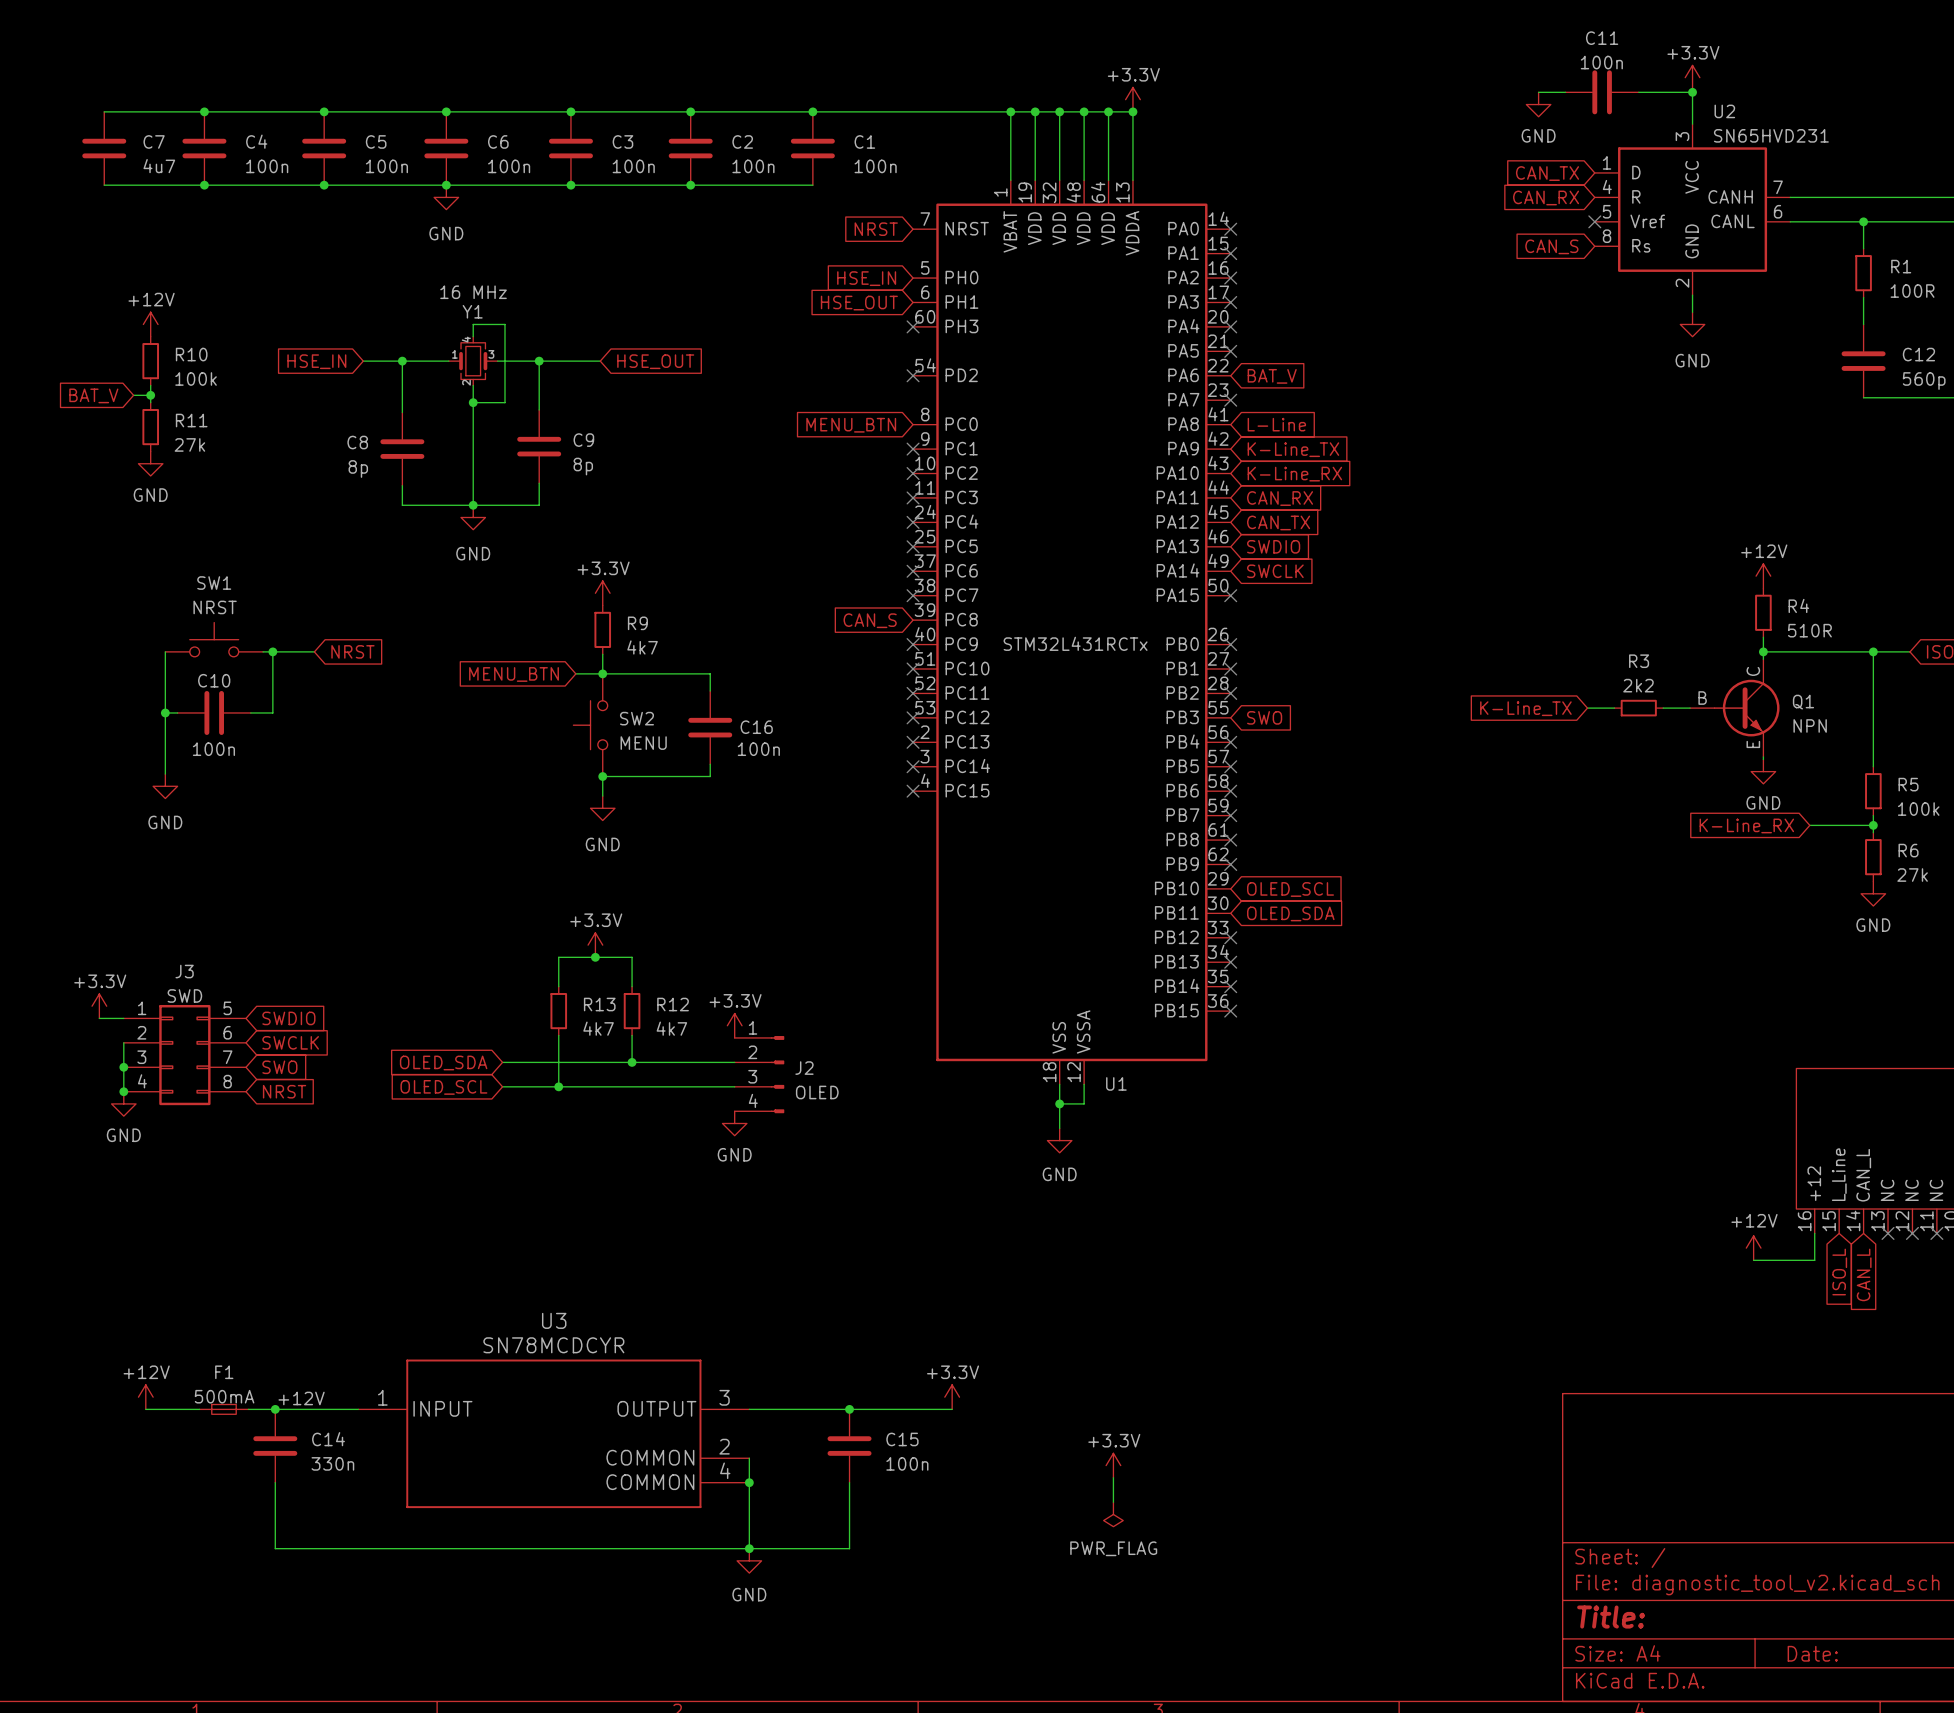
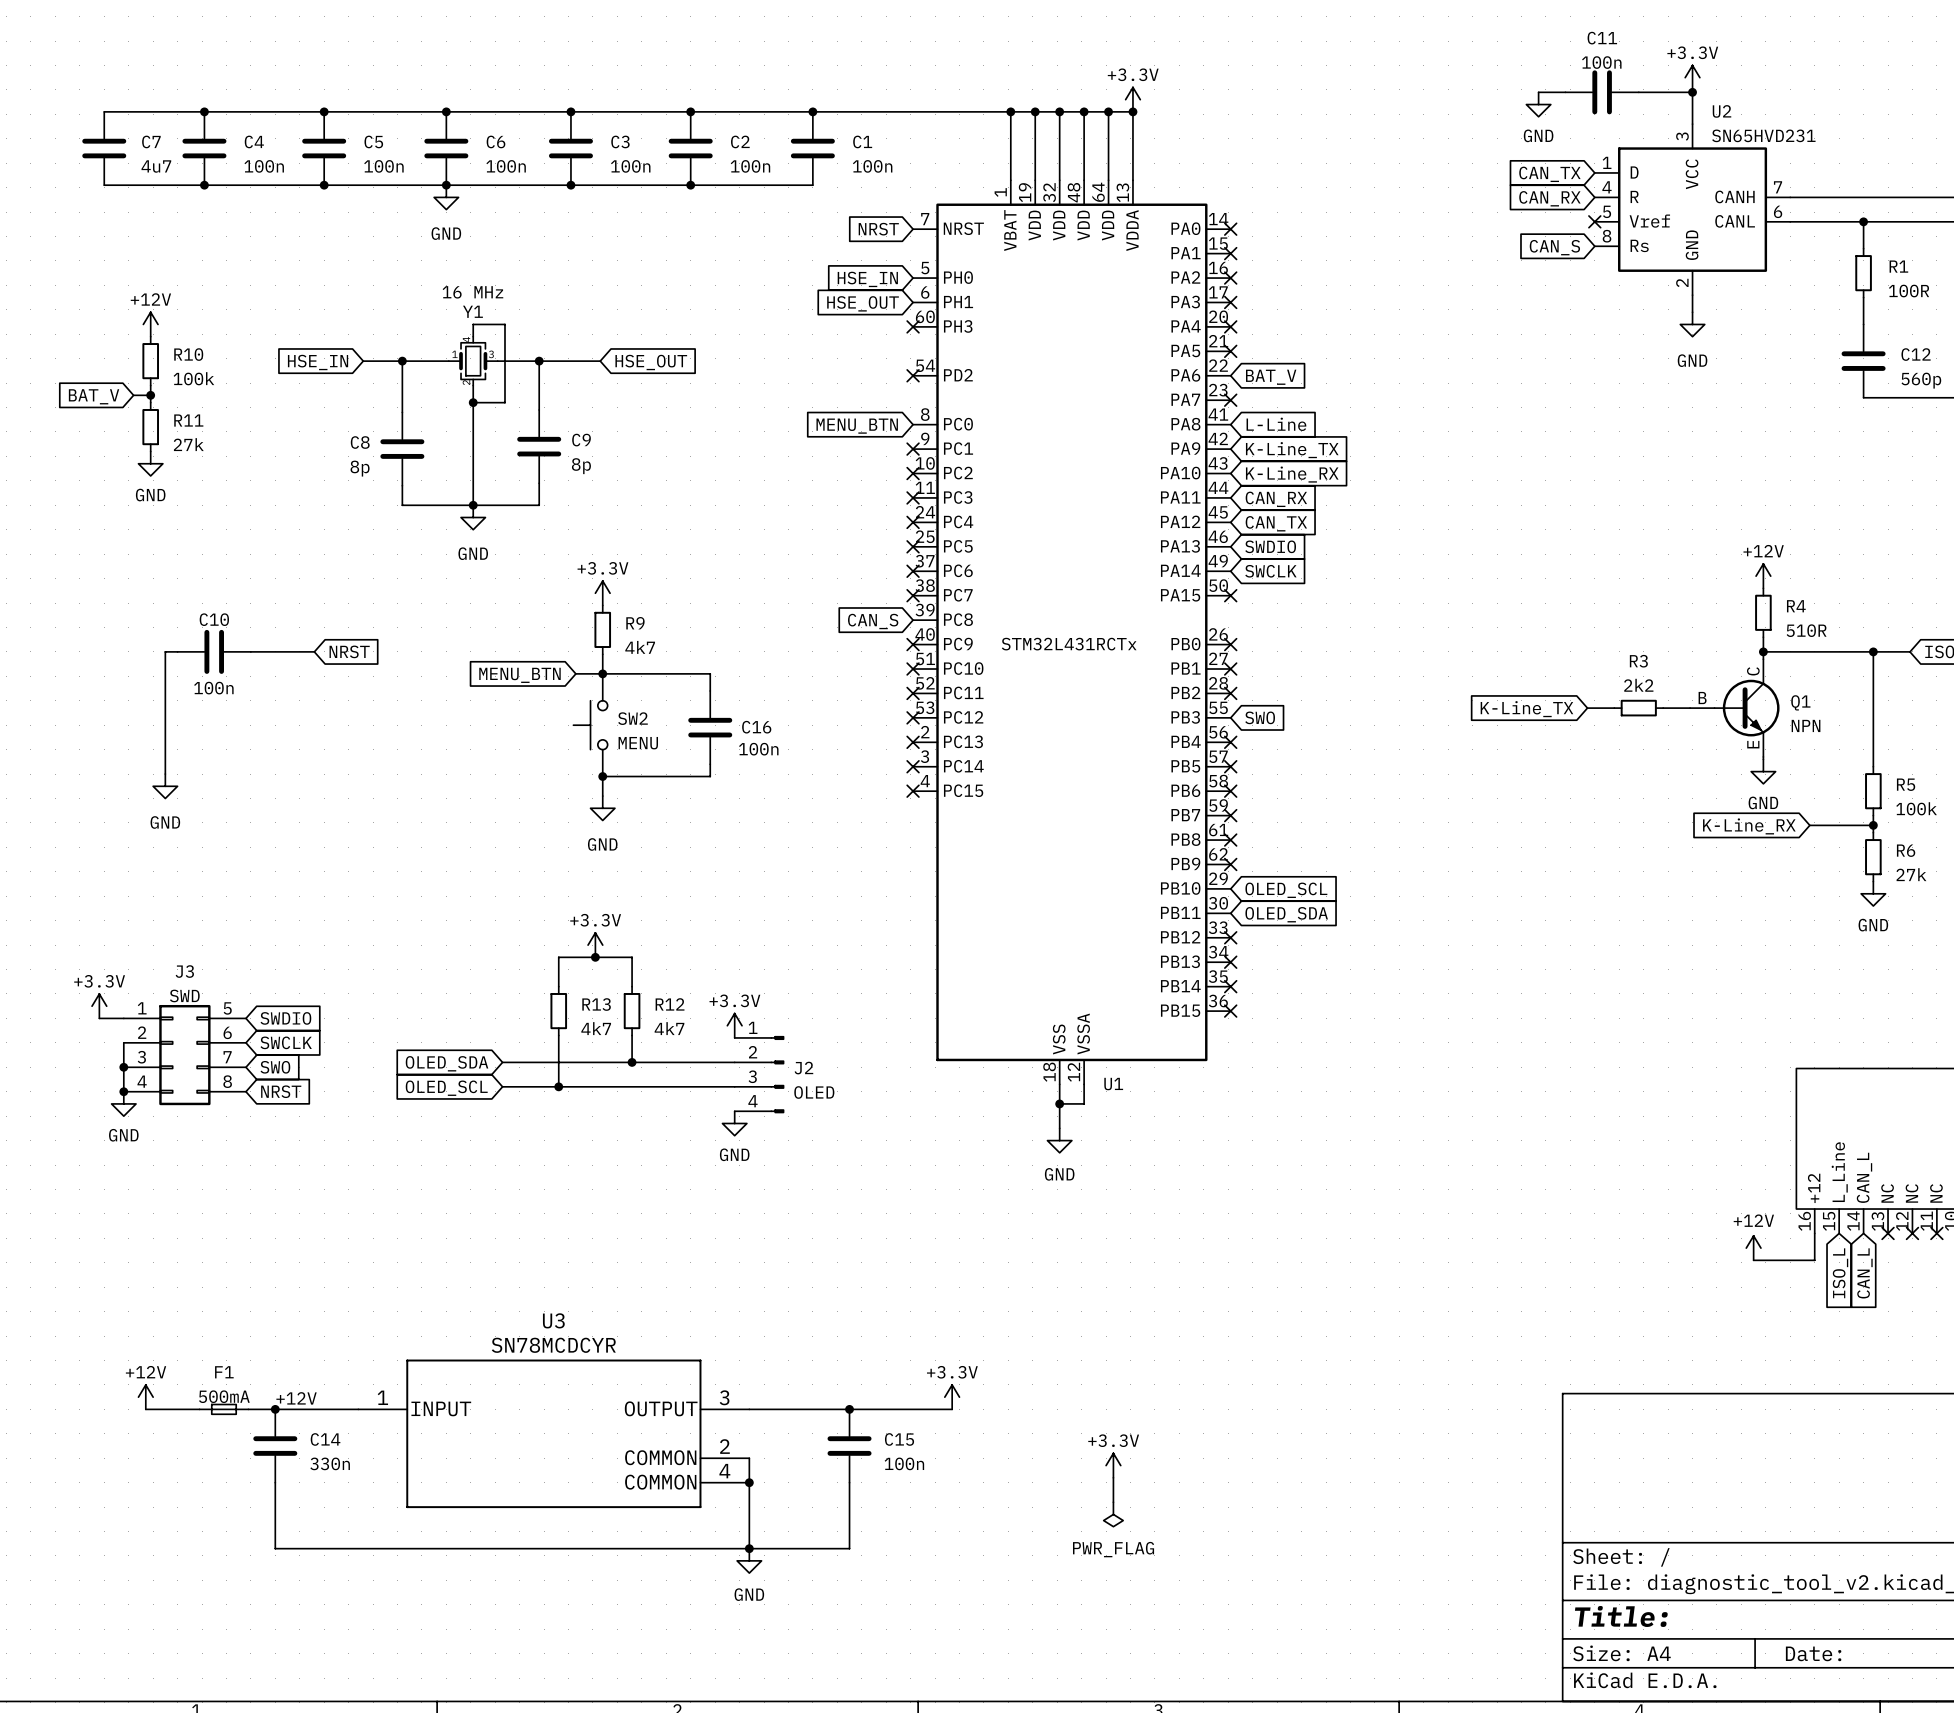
SW1: NRST (214, 639) -> none
wire: (272, 651) (272, 712) (250, 712) -> none
junction: (272, 651) -> none
junction: (165, 712) -> none
C10 position: (214, 712) -> (214, 651)

